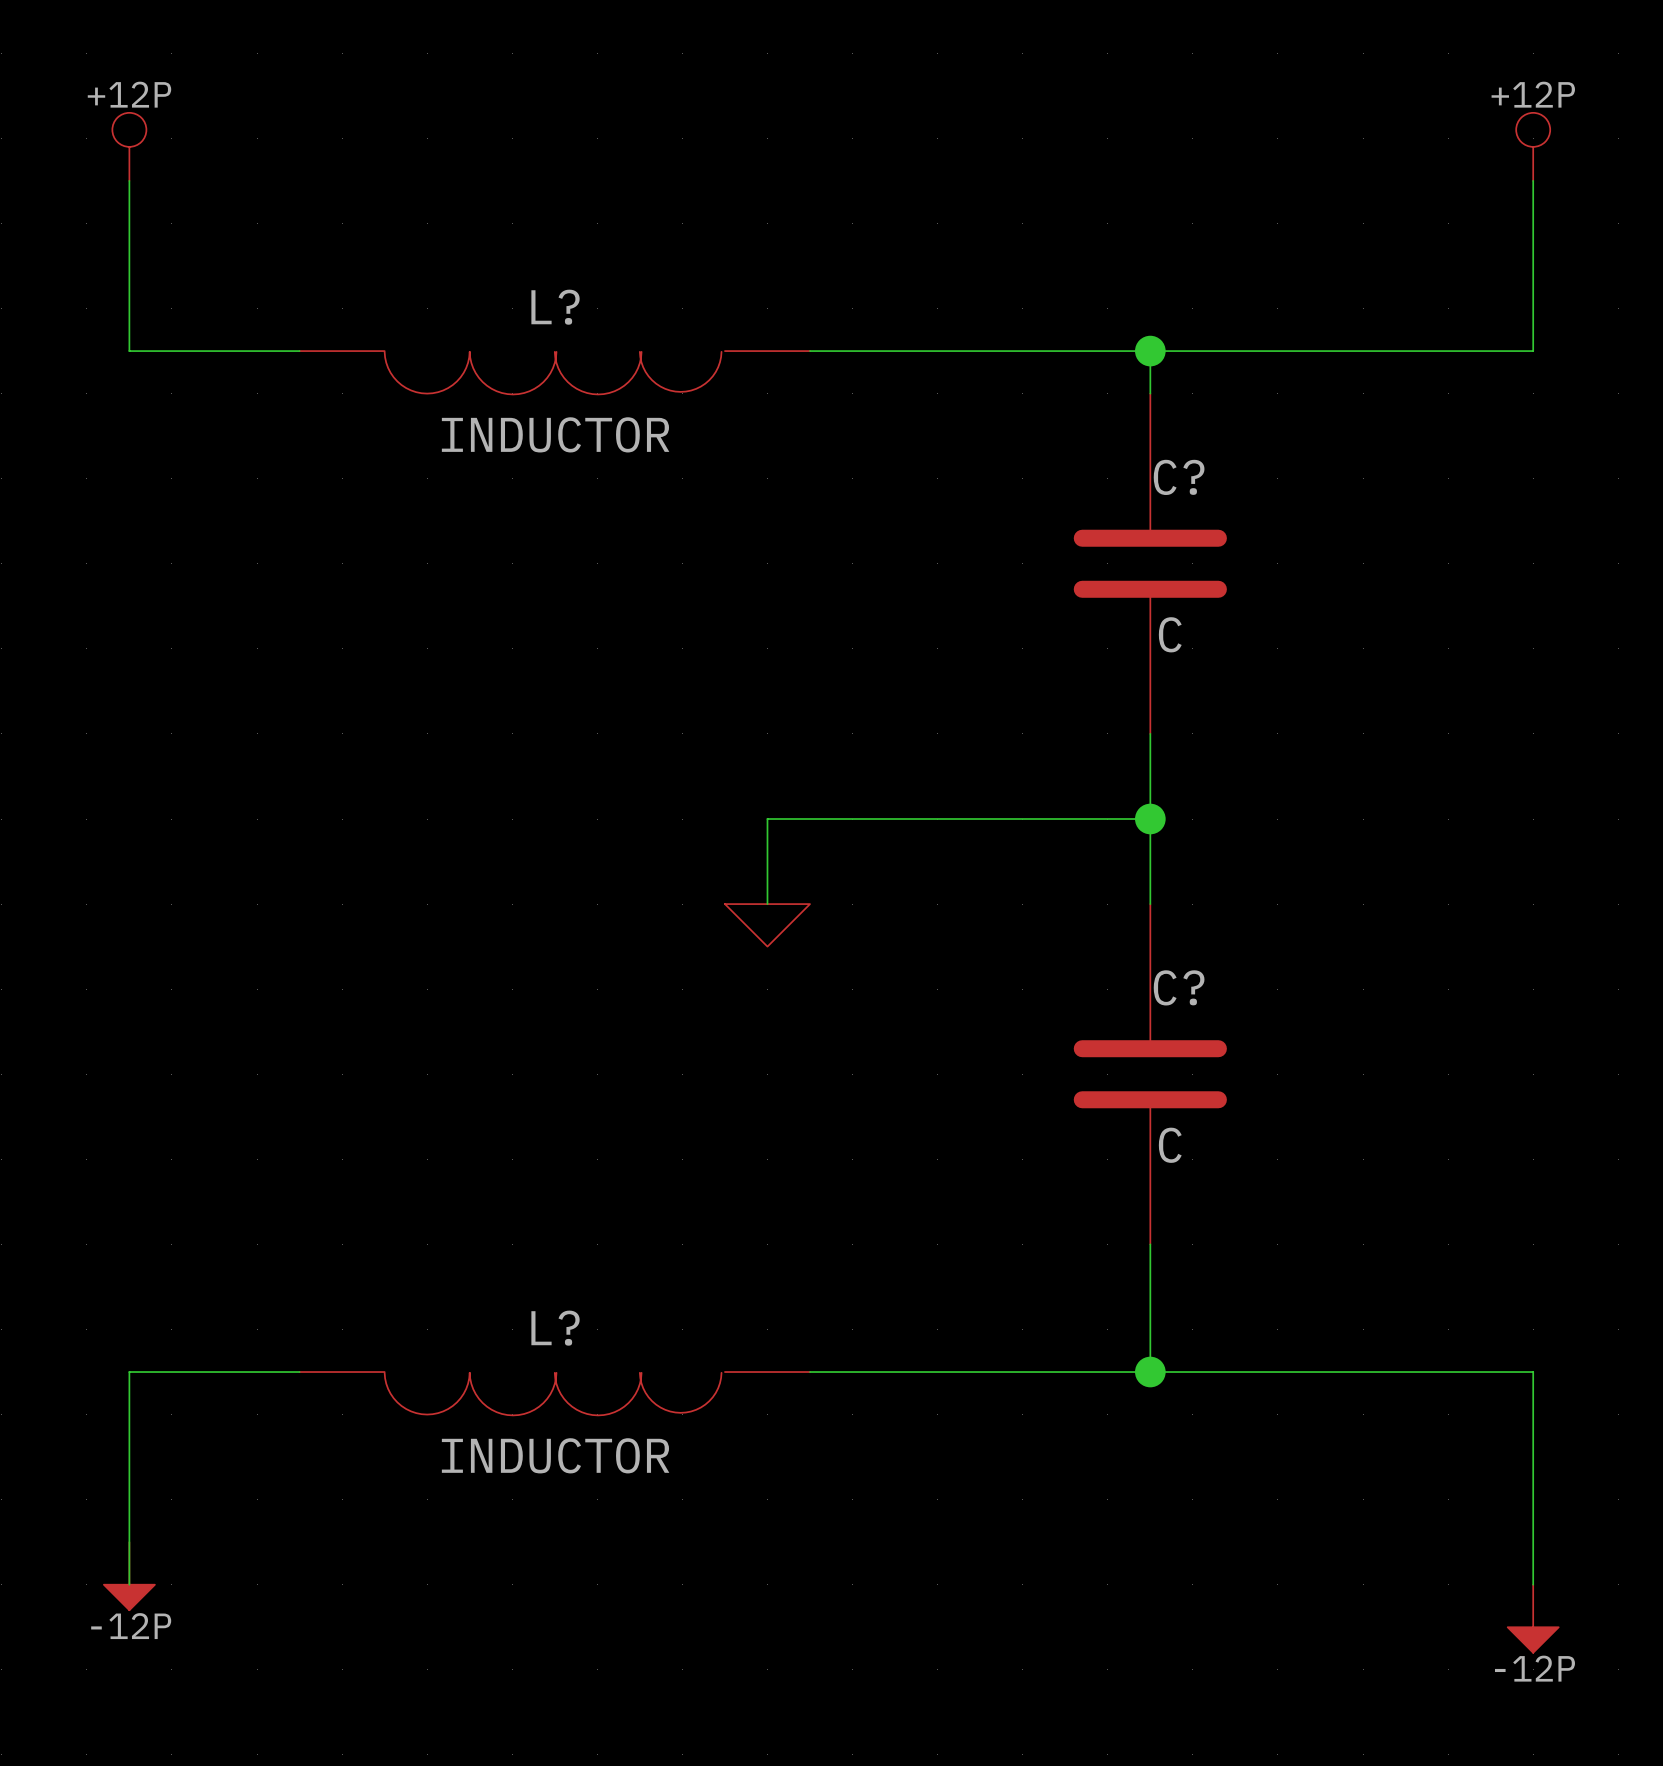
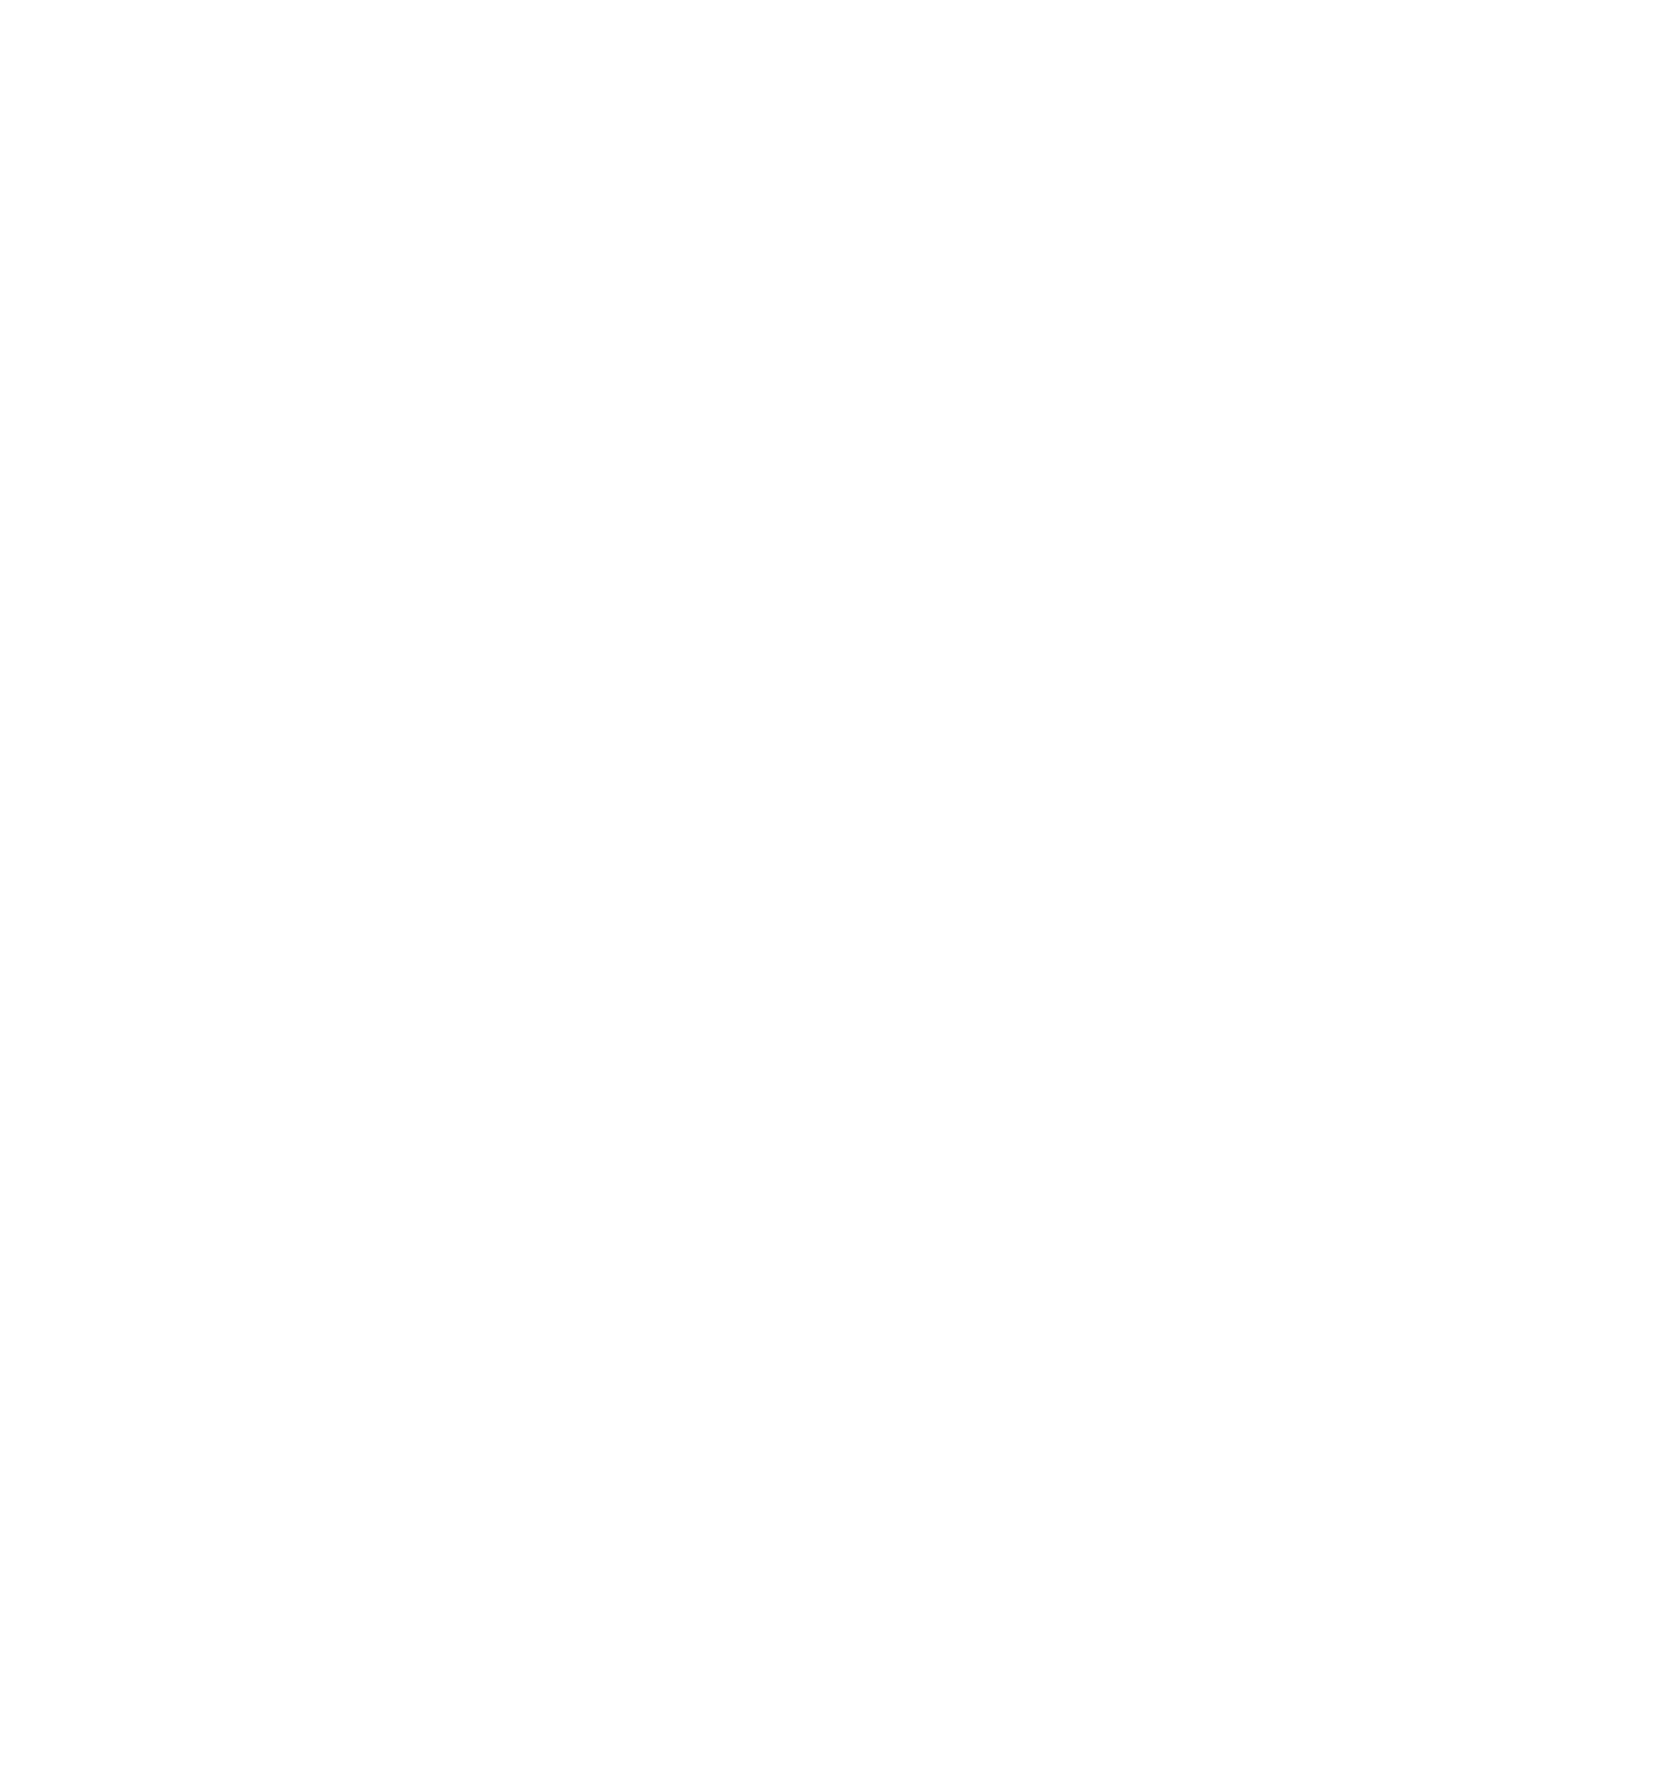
power symbol: +12P (129, 146) -> none
power symbol: +12P (1533, 146) -> none
wire: (129, 180) (129, 351) (299, 351) -> none
wire: (1533, 180) (1533, 351) (810, 351) -> none
wire: (1150, 351) (1150, 393) -> none
junction: (1150, 351) -> none
L?: INDUCTOR (554, 372) -> none
C?: C (1150, 563) -> none
wire: (1150, 733) (1150, 904) -> none
wire: (1150, 819) (767, 819) (767, 904) -> none
junction: (1150, 819) -> none
power symbol: (767, 925) -> none
C?: C (1150, 1074) -> none
wire: (1150, 1244) (1150, 1372) -> none
wire: (299, 1372) (129, 1372) (129, 1584) -> none
wire: (810, 1372) (1533, 1372) (1533, 1584) -> none
junction: (1150, 1372) -> none
L?: INDUCTOR (554, 1393) -> none
power symbol: -12P (129, 1576) -> none
power symbol: -12P (1533, 1618) -> none

